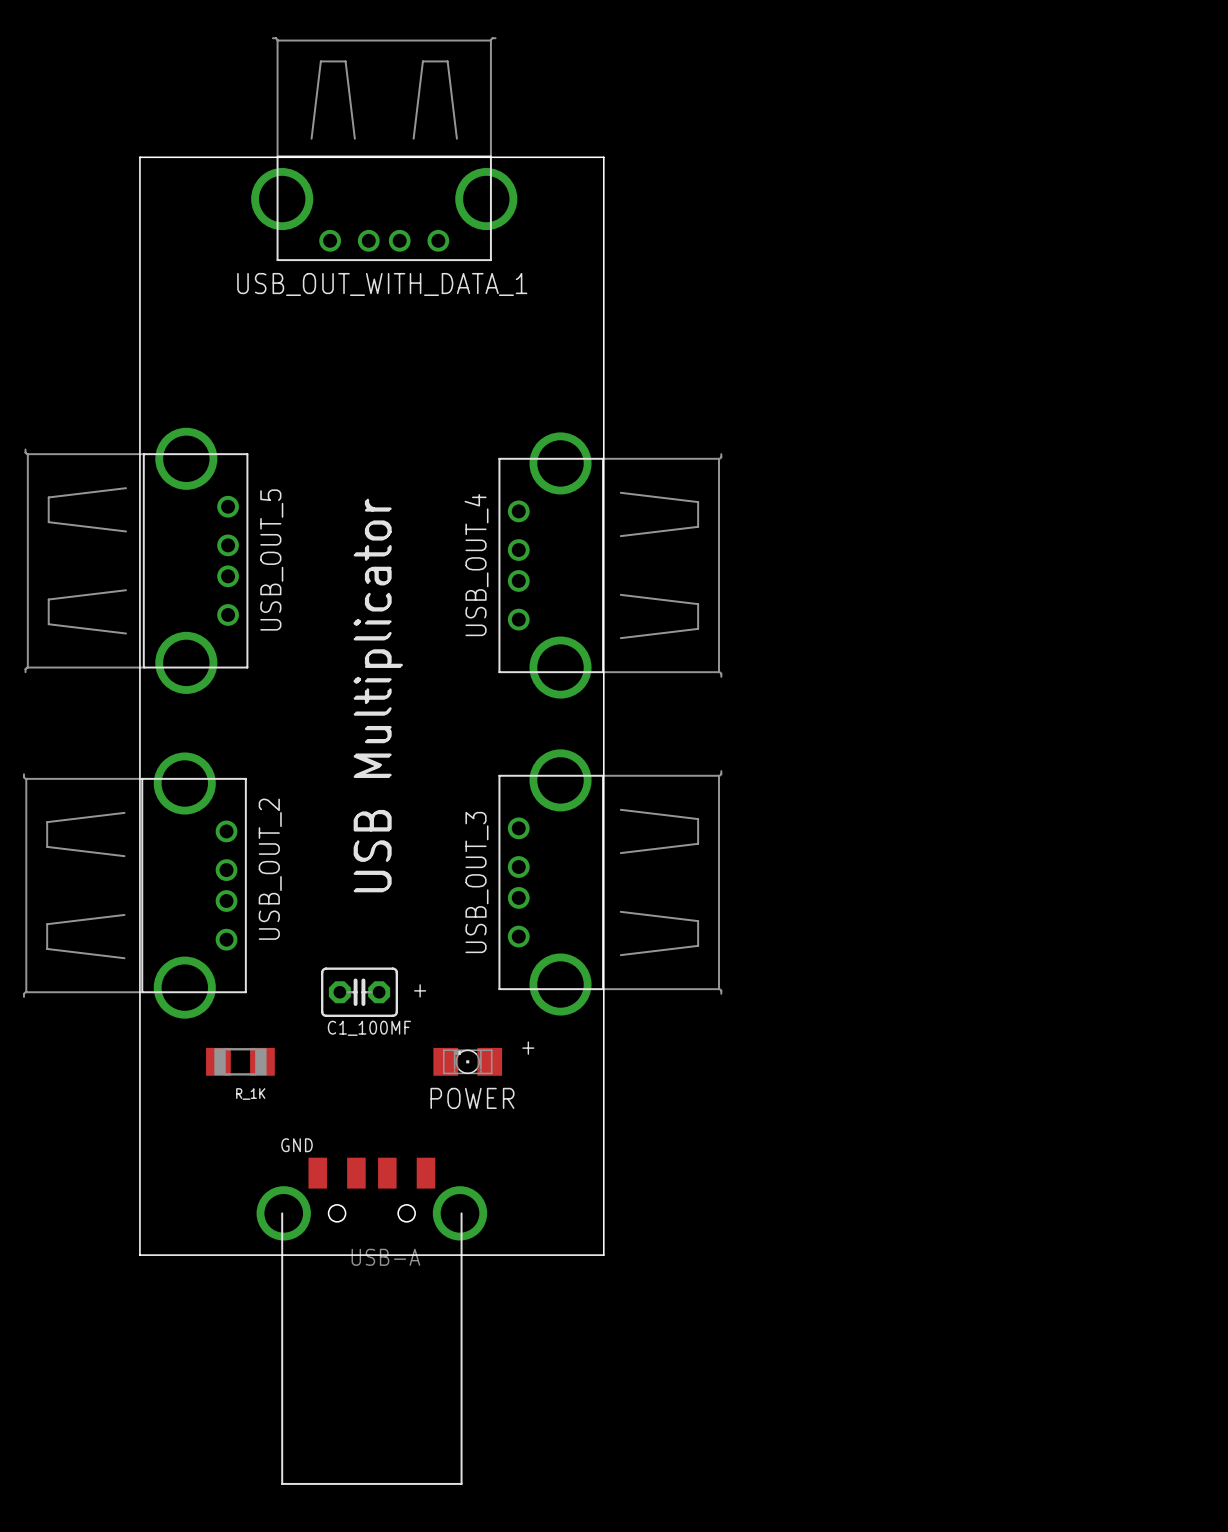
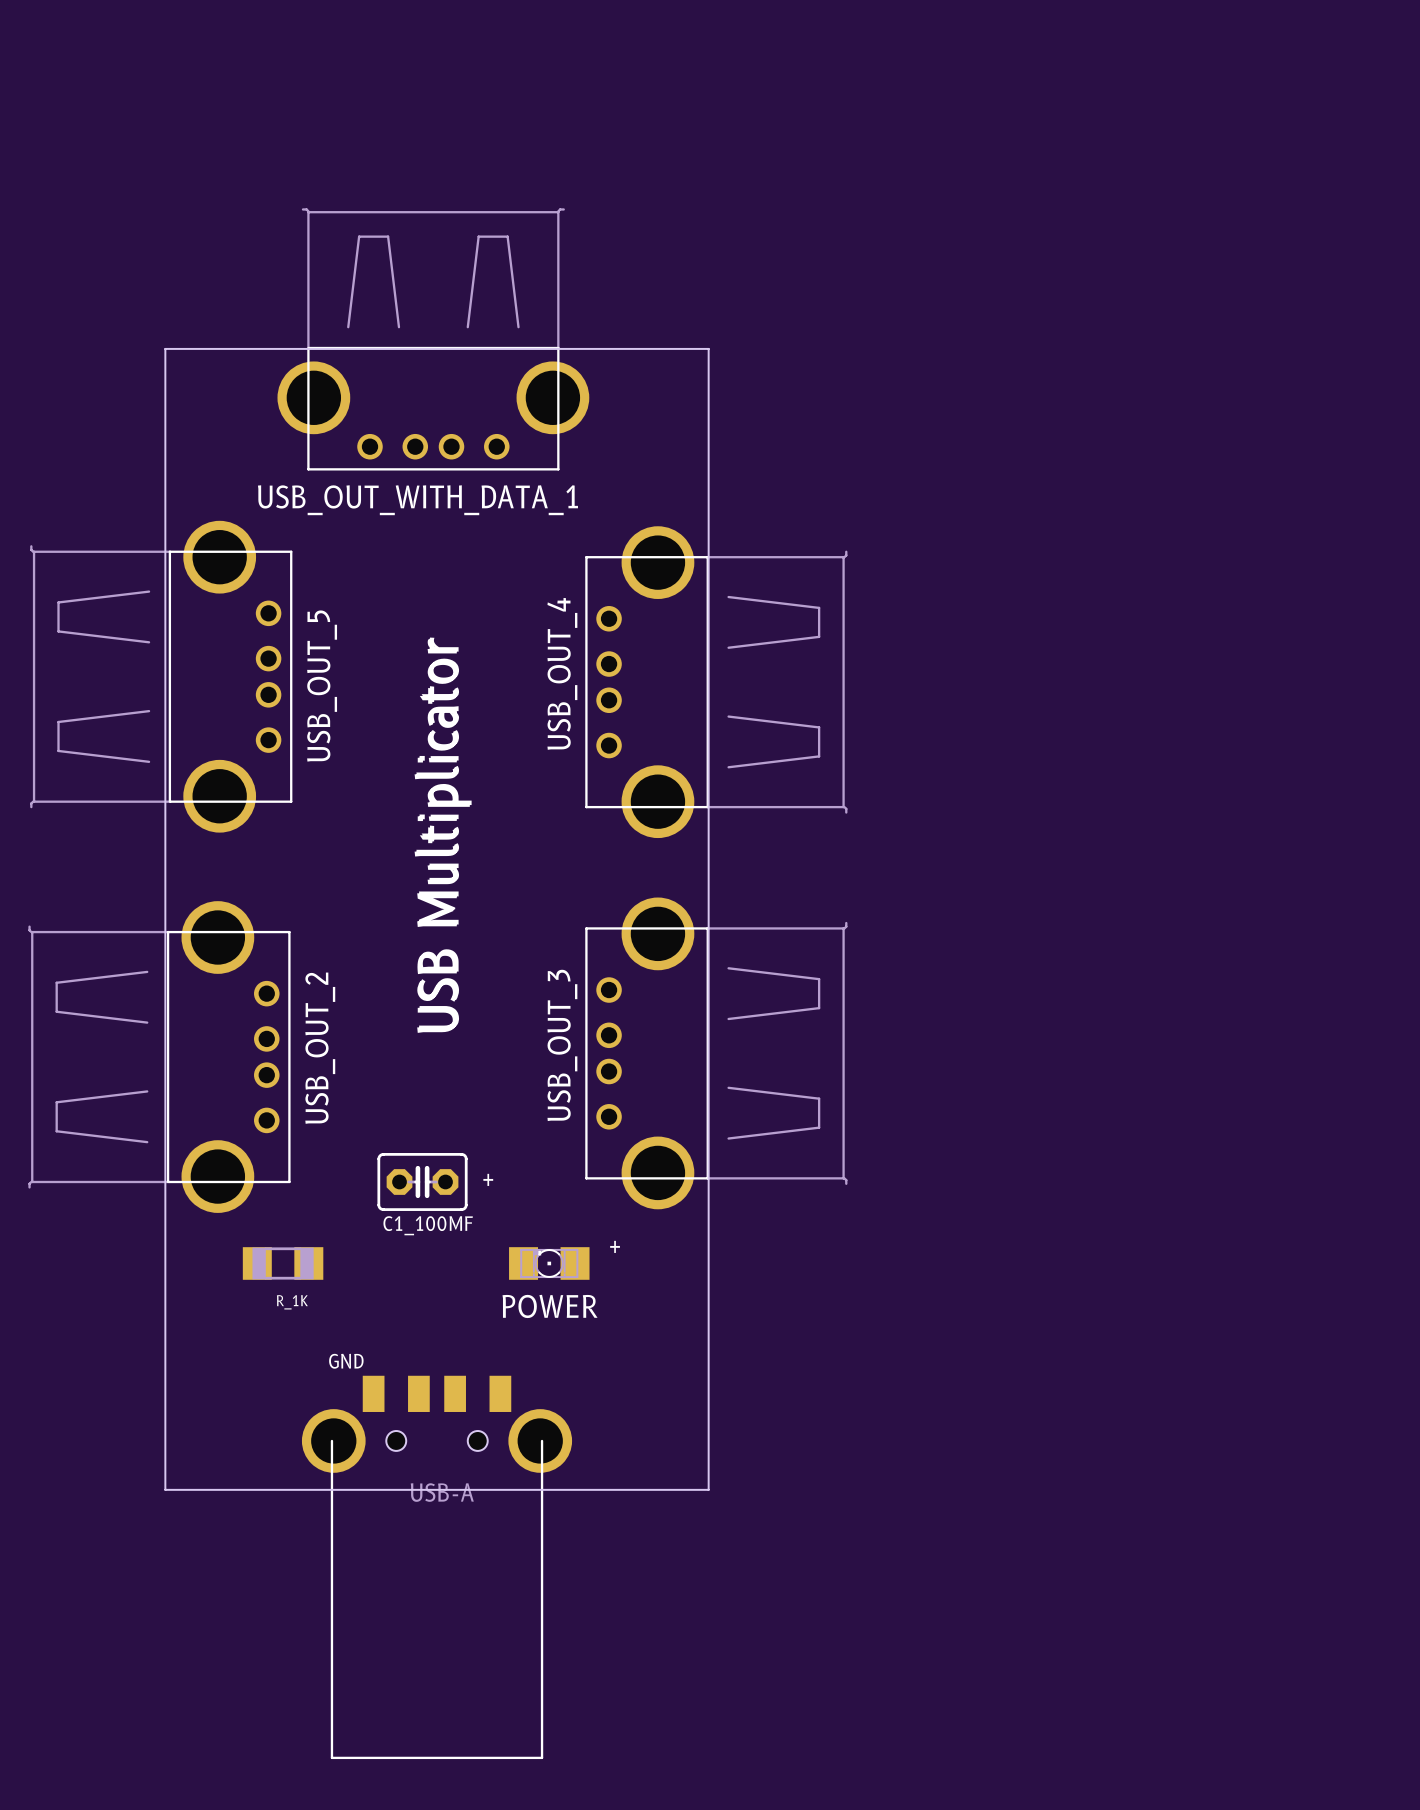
USB_OUT_WITH_DATA_1 position: (384, 149) -> (433, 339)
board edge: (139, 280) (139, 157) (603, 157) (603, 280) -> (165, 348) (708, 348)

